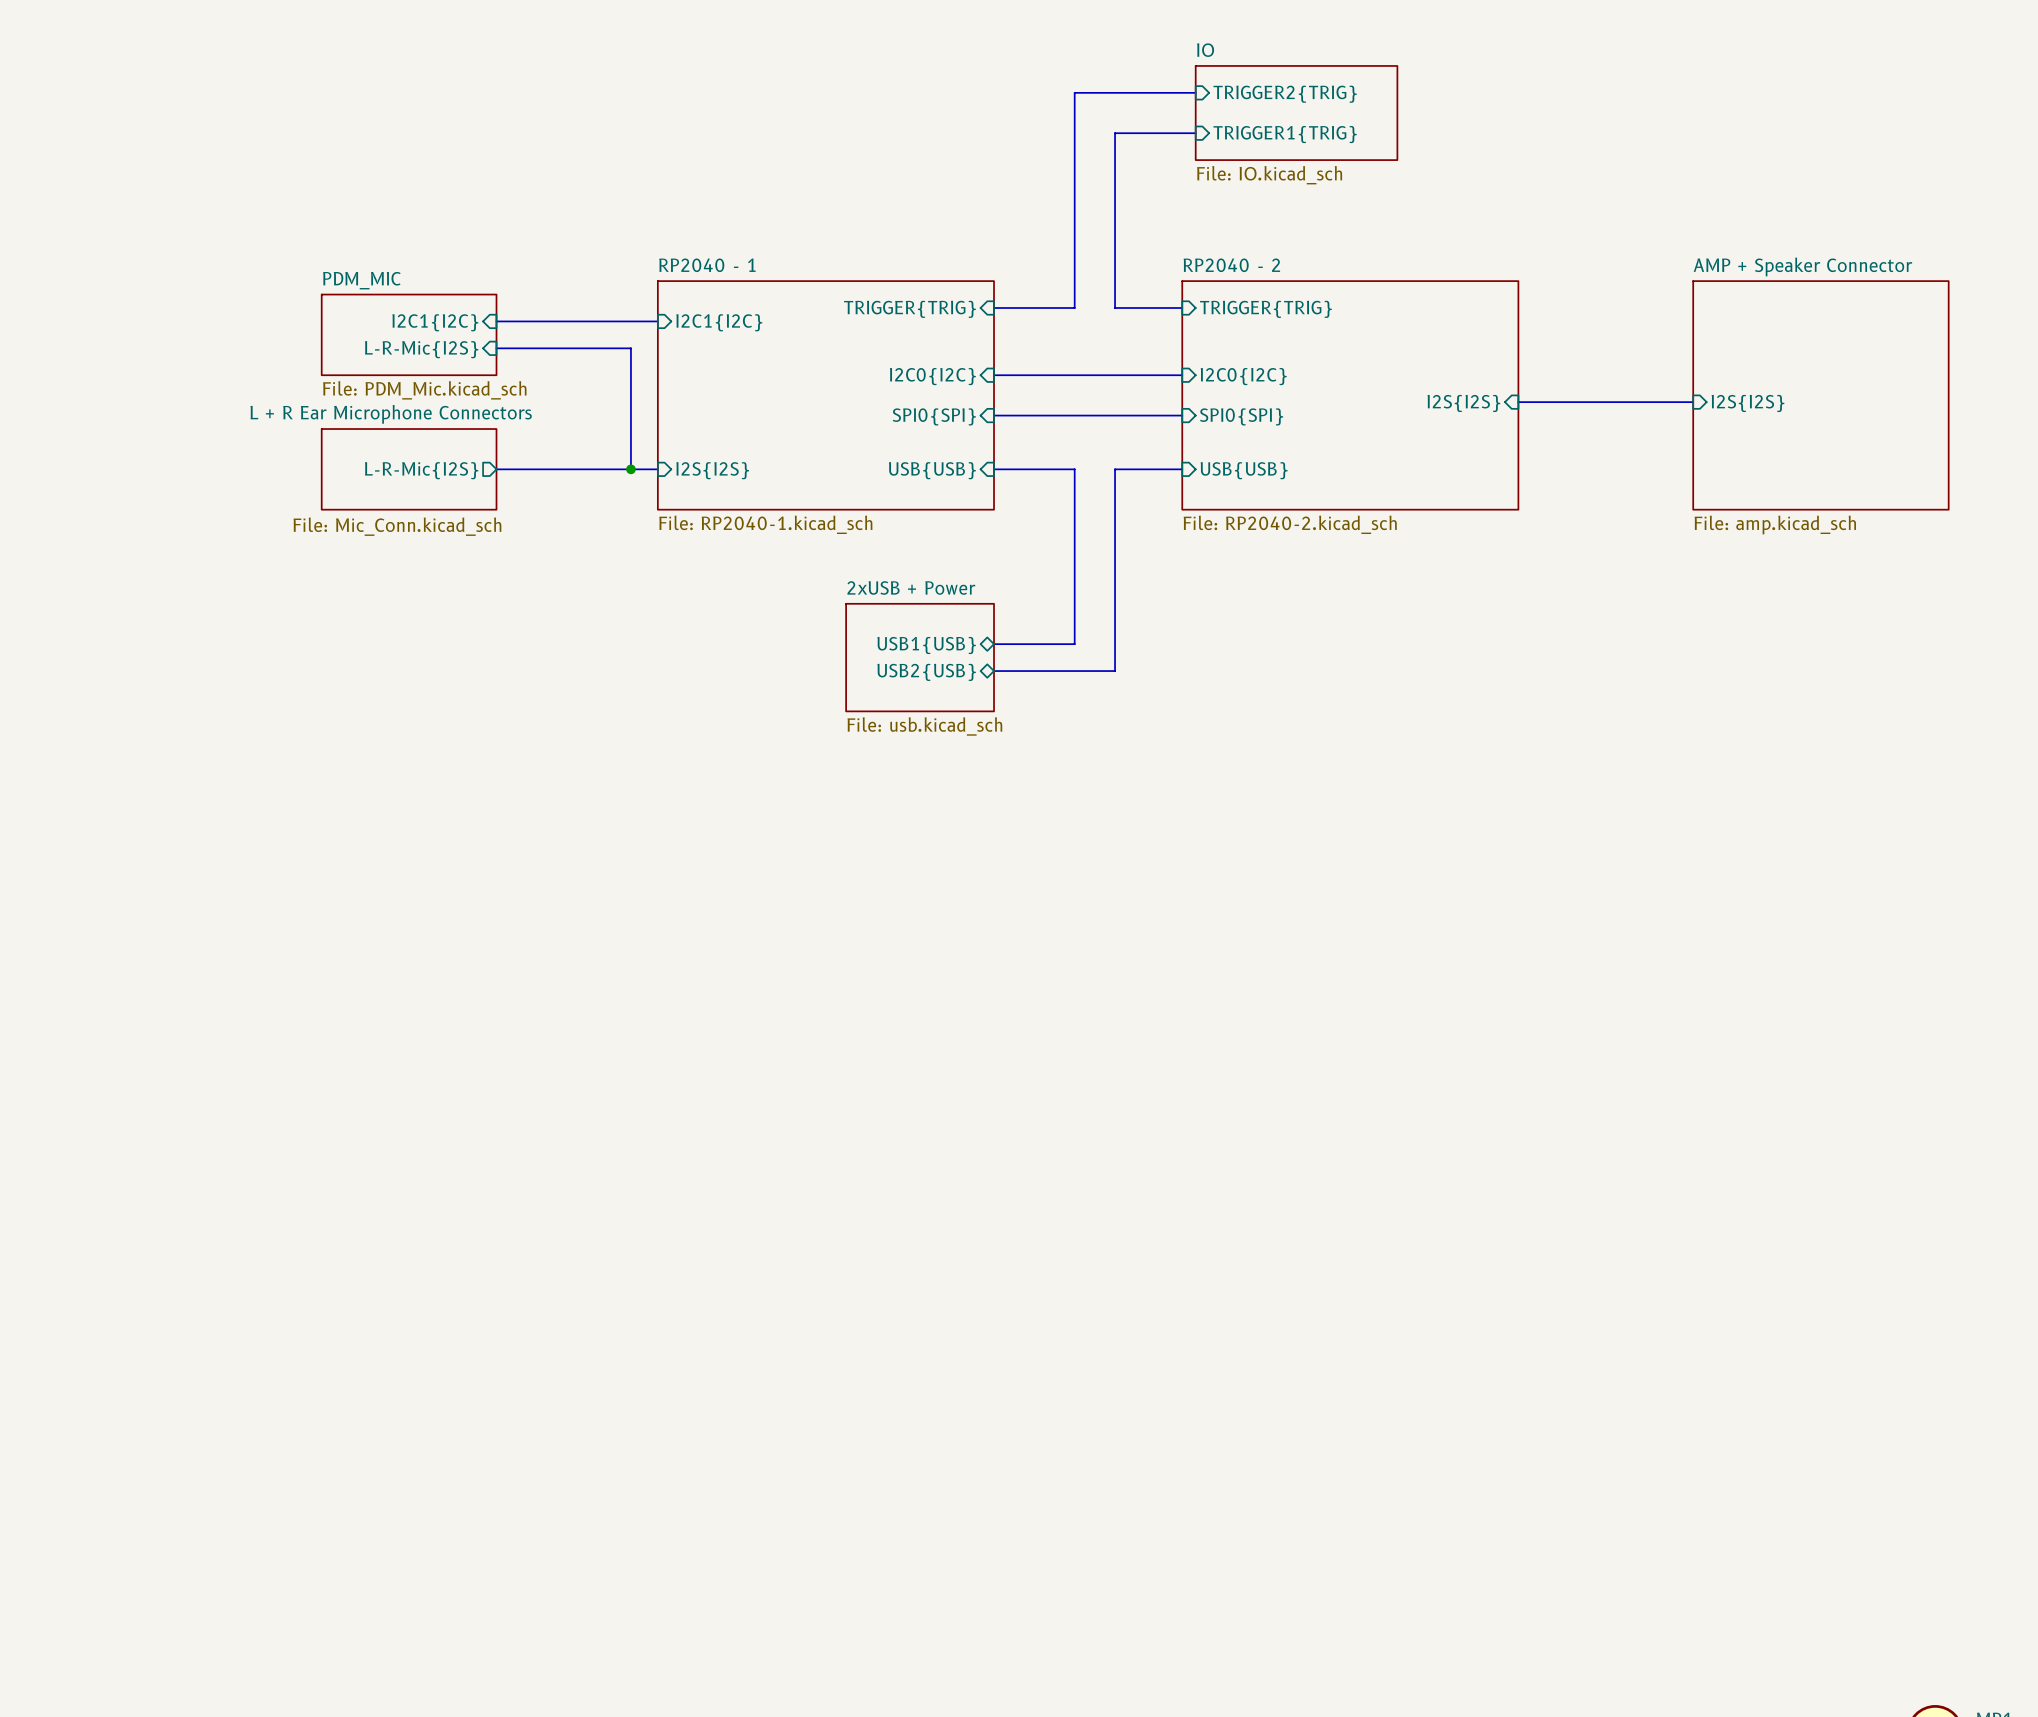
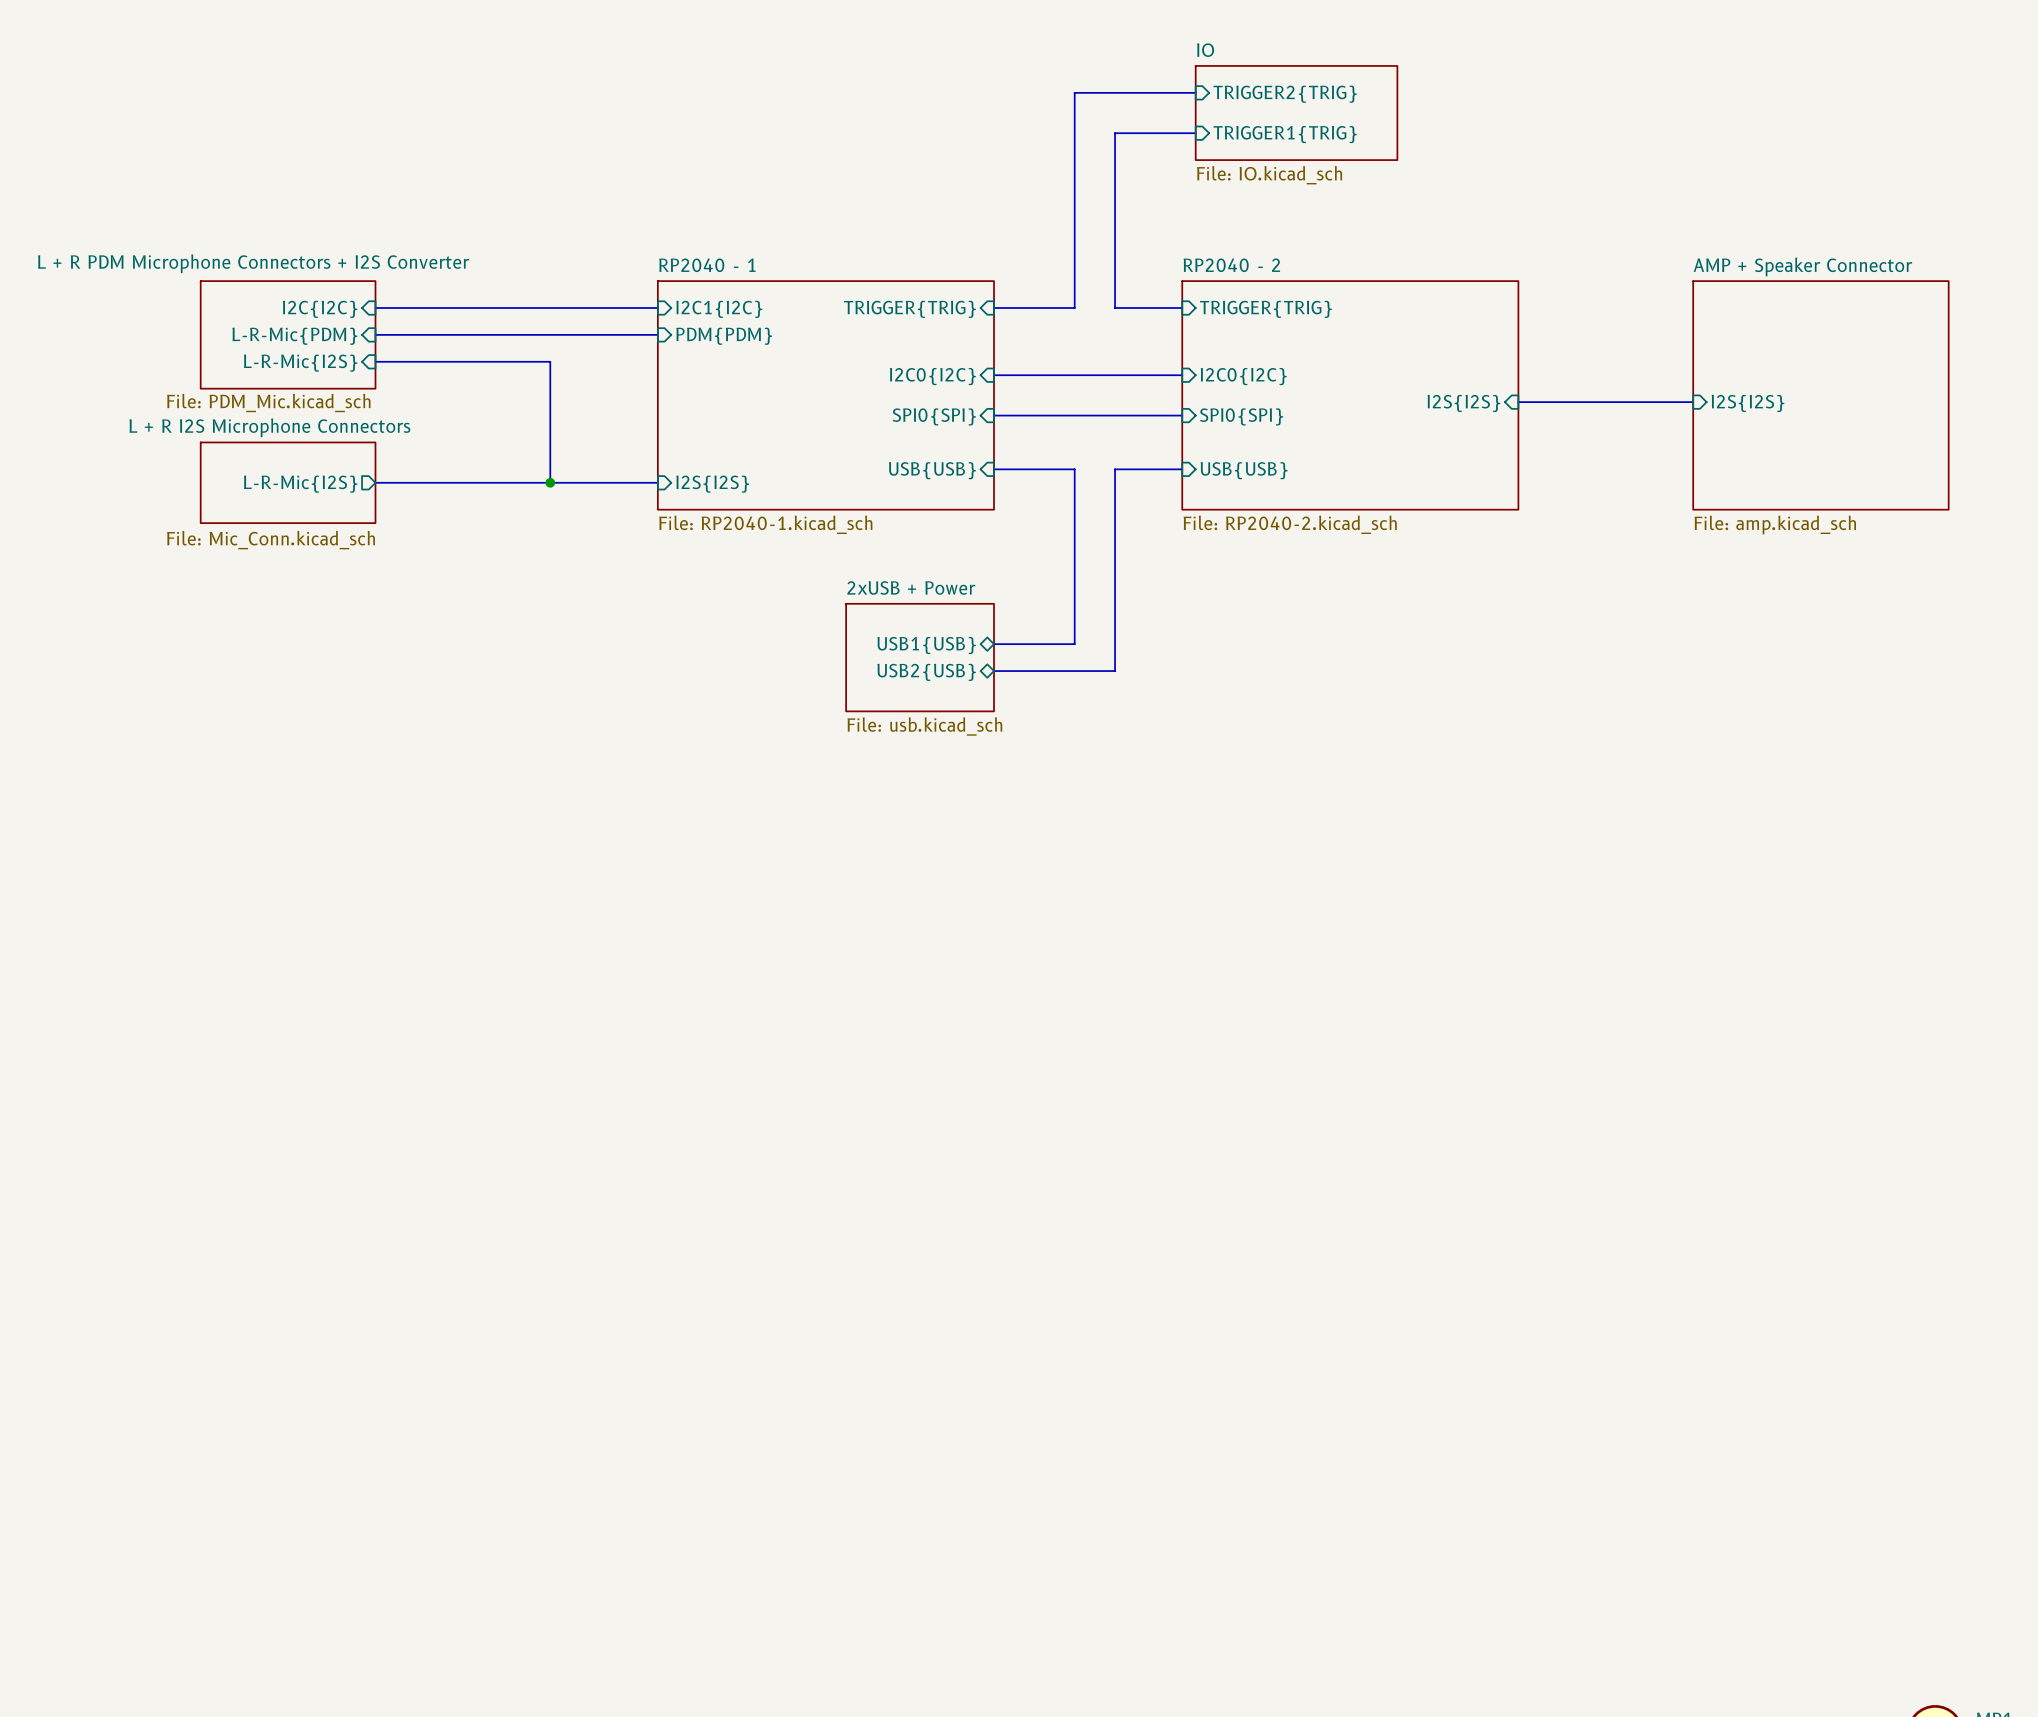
bus: none -> (375, 308) (657, 308)
bus: (496, 321) (657, 321) -> none
sheet pin: I2C1{I2C} (435, 322) -> I2C{I2C} (320, 309)
sheet pin position: I2C1{I2C} (719, 322) -> I2C1{I2C} (719, 309)
sheet L + R PDM Microphone Connectors + I2S Converter: none -> File: PDM_Mic.kicad_sch (288, 334)
bus: none -> (375, 334) (657, 334)
sheet PDM_MIC: File: PDM_Mic.kicad_sch (409, 334) -> none
sheet pin: none -> L-R-Mic{PDM} (294, 336)
sheet pin: none -> PDM{PDM} (724, 336)
bus: (496, 348) (630, 348) (630, 469) -> none
sheet pin: L-R-Mic{I2S} (421, 349) -> none
bus: none -> (375, 361) (550, 361) (550, 482)
sheet pin: none -> L-R-Mic{I2S} (300, 363)
sheet L + R Ear Microphone Connectors: File: Mic_Conn.kicad_sch (409, 469) -> none
bus: (496, 469) (657, 469) -> none
junction: (630, 469) -> none
sheet pin position: L-R-Mic{I2S} (421, 470) -> L-R-Mic{I2S} (300, 484)
sheet pin position: I2S{I2S} (712, 470) -> I2S{I2S} (712, 484)
sheet L + R I2S Microphone Connectors: none -> File: Mic_Conn.kicad_sch (288, 482)
bus: none -> (375, 482) (657, 482)
junction: none -> (550, 482)

